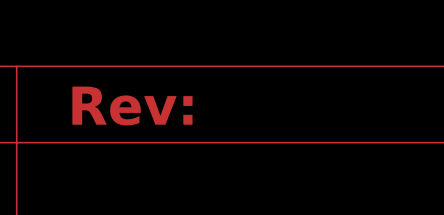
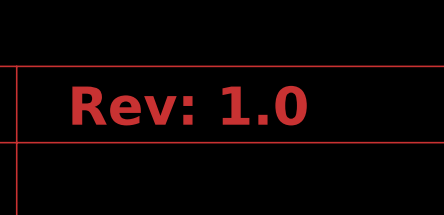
title block: Rev: (132, 106) -> Rev: 1.0 (189, 105)

